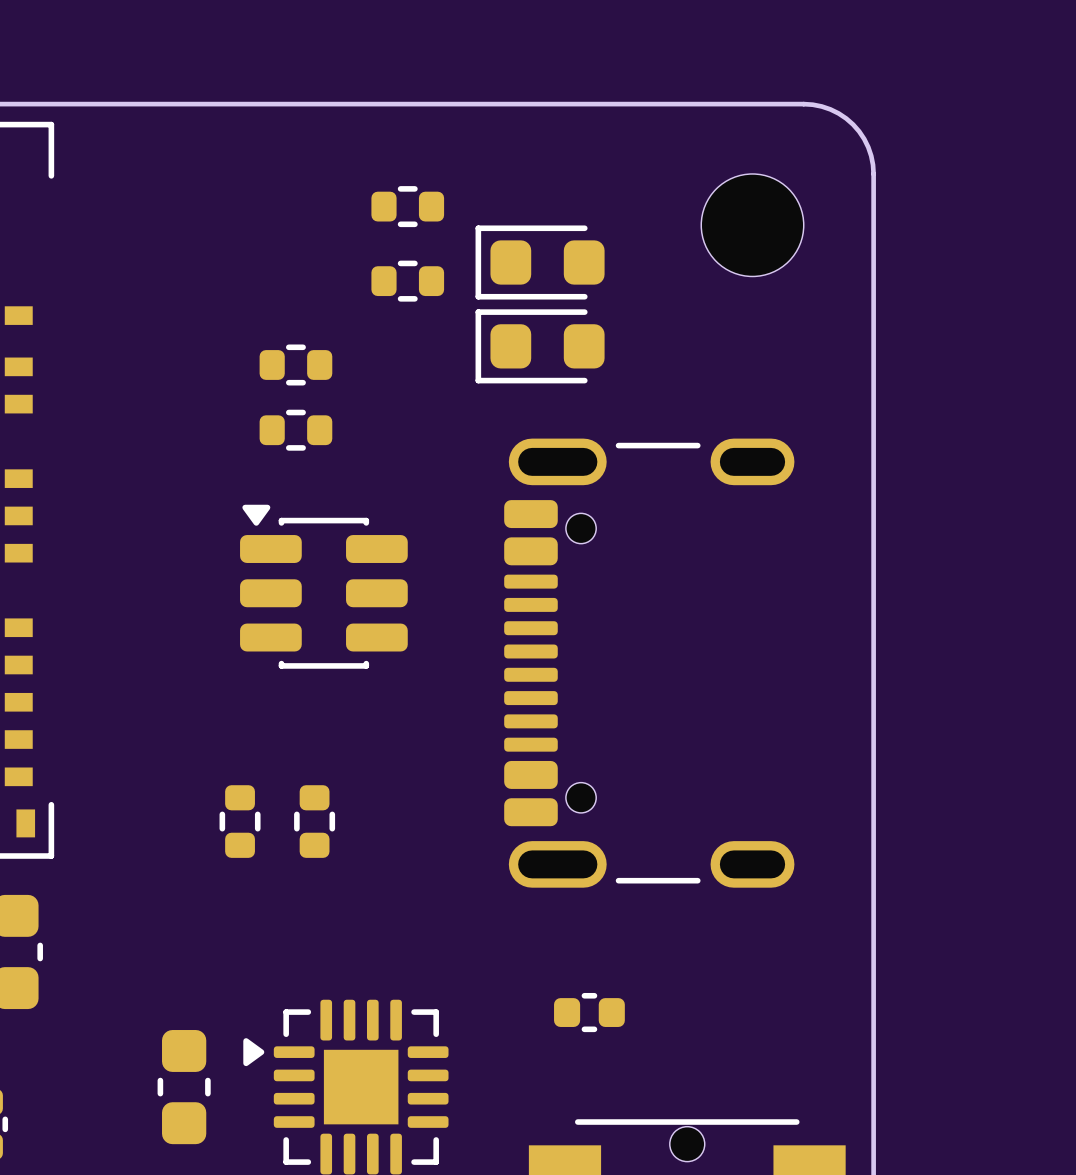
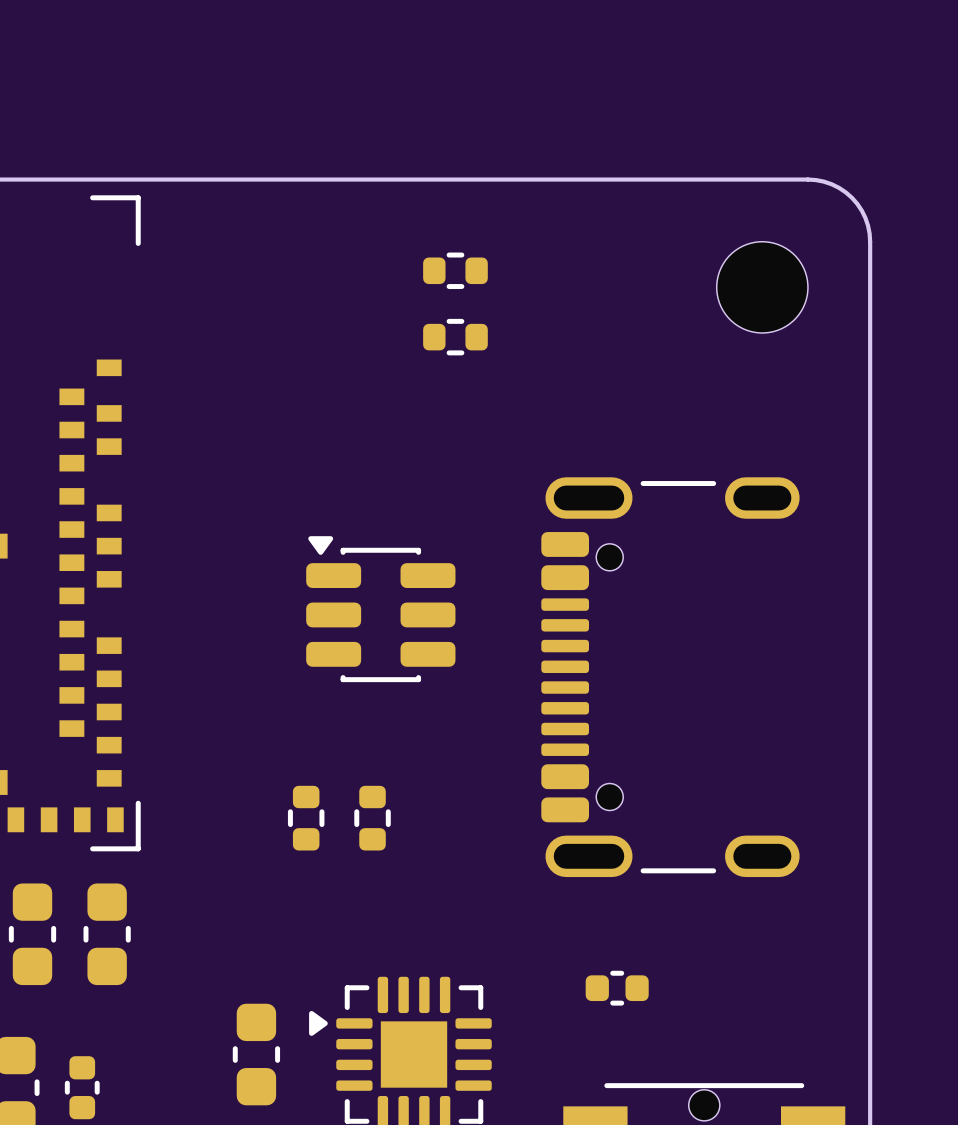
part: (540, 262) -> none
part: (540, 346) -> none
part: (295, 364) -> none
part: (295, 430) -> none

